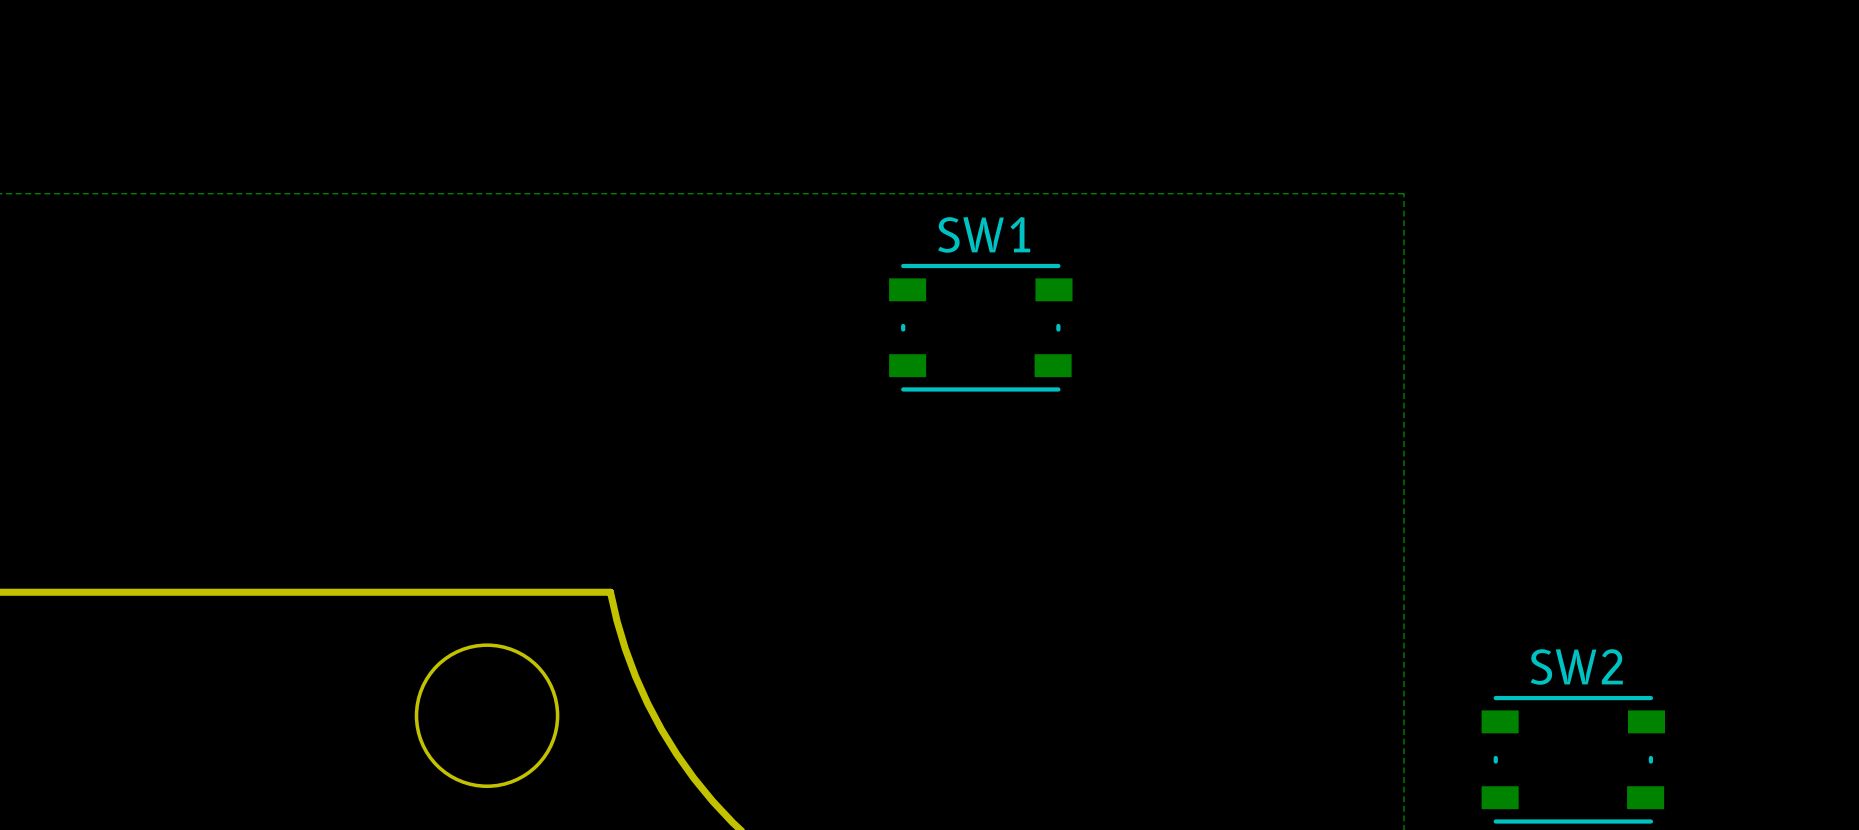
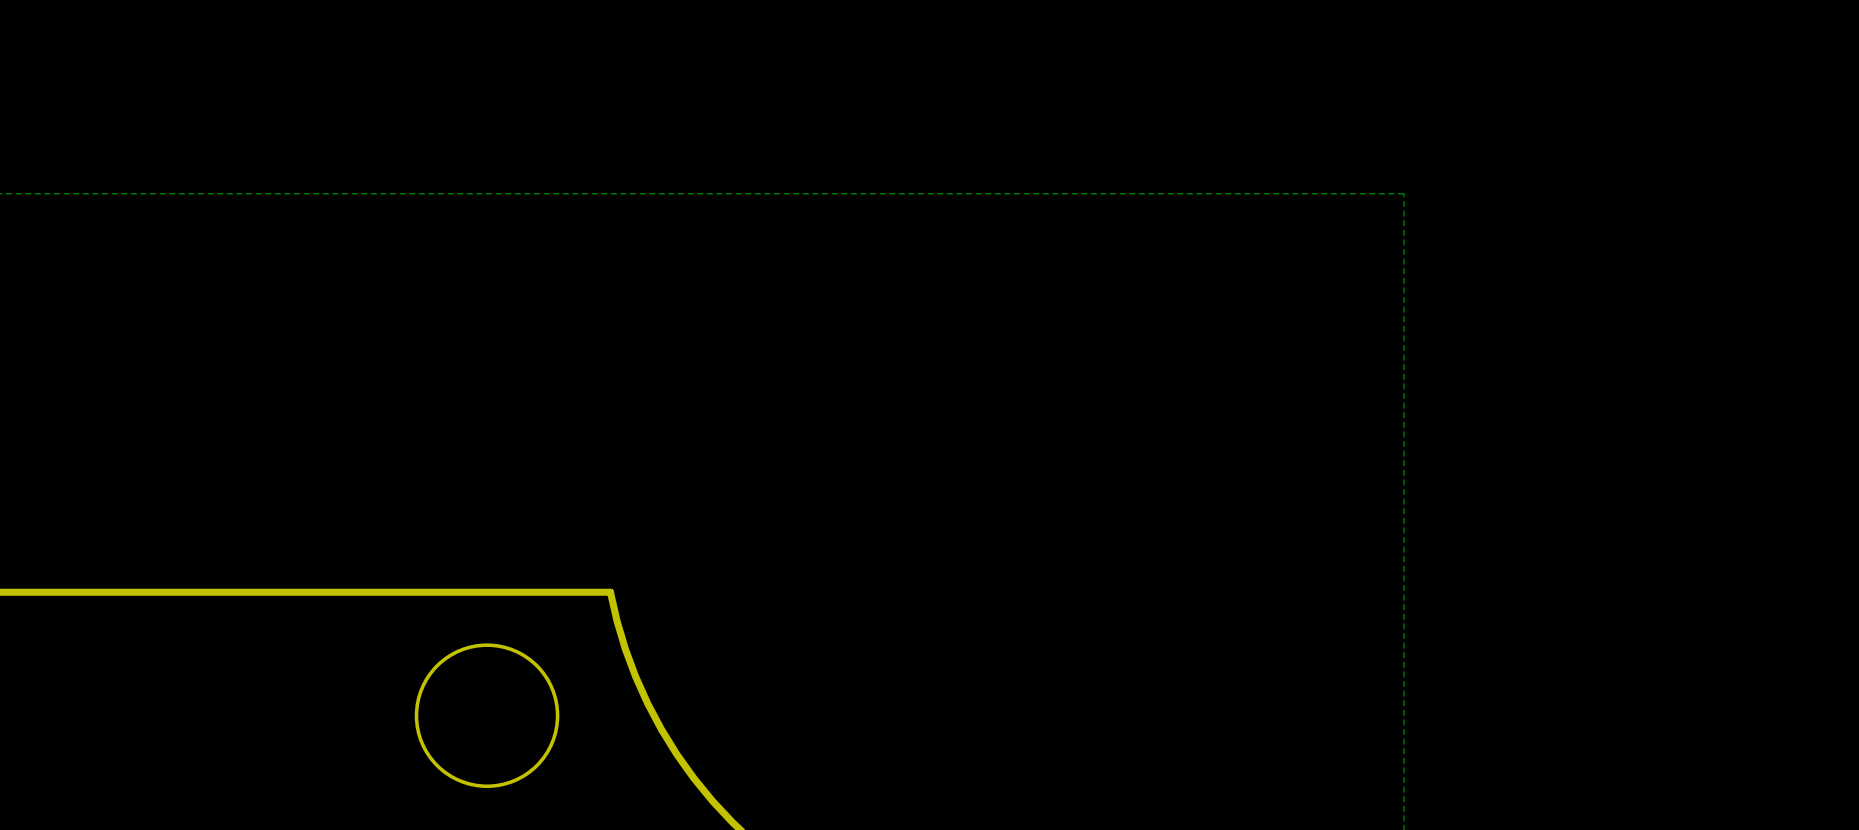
SW1: (980, 327) -> none
SW2: (1573, 759) -> none

